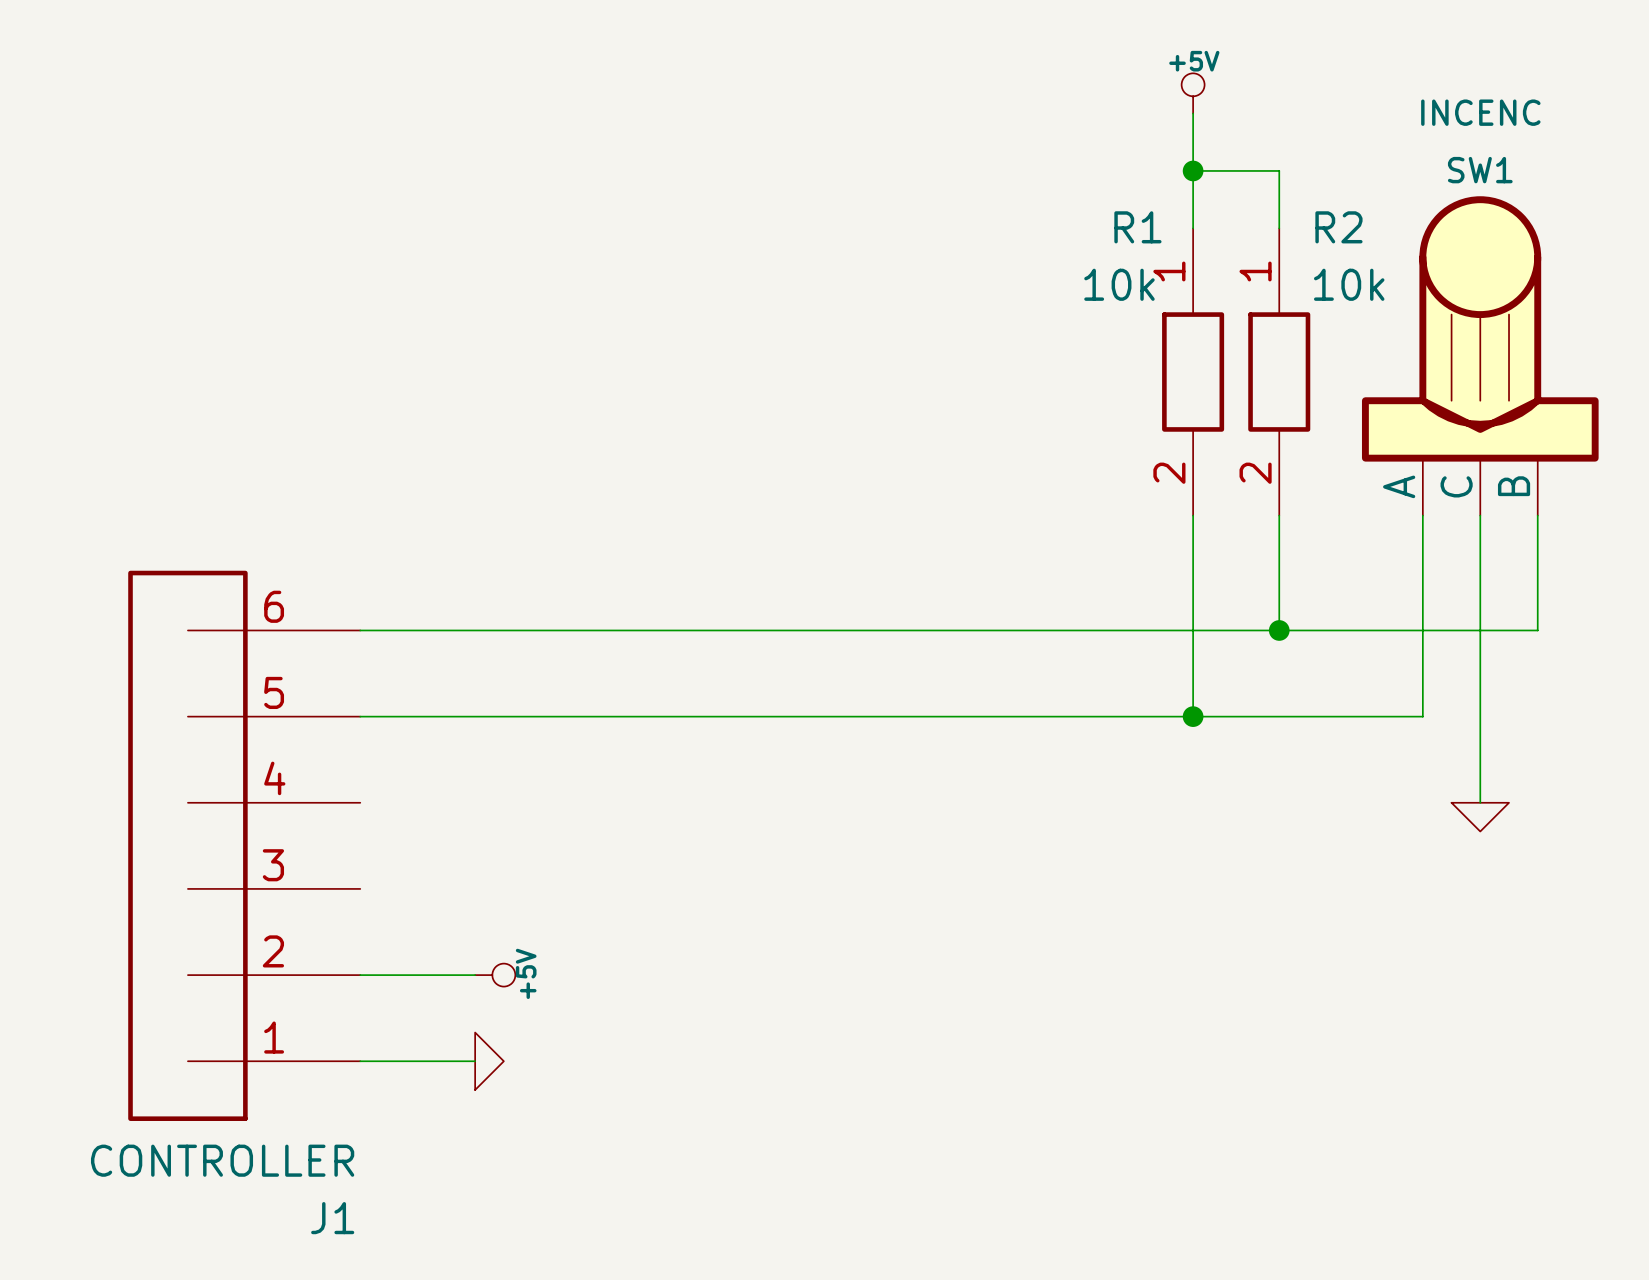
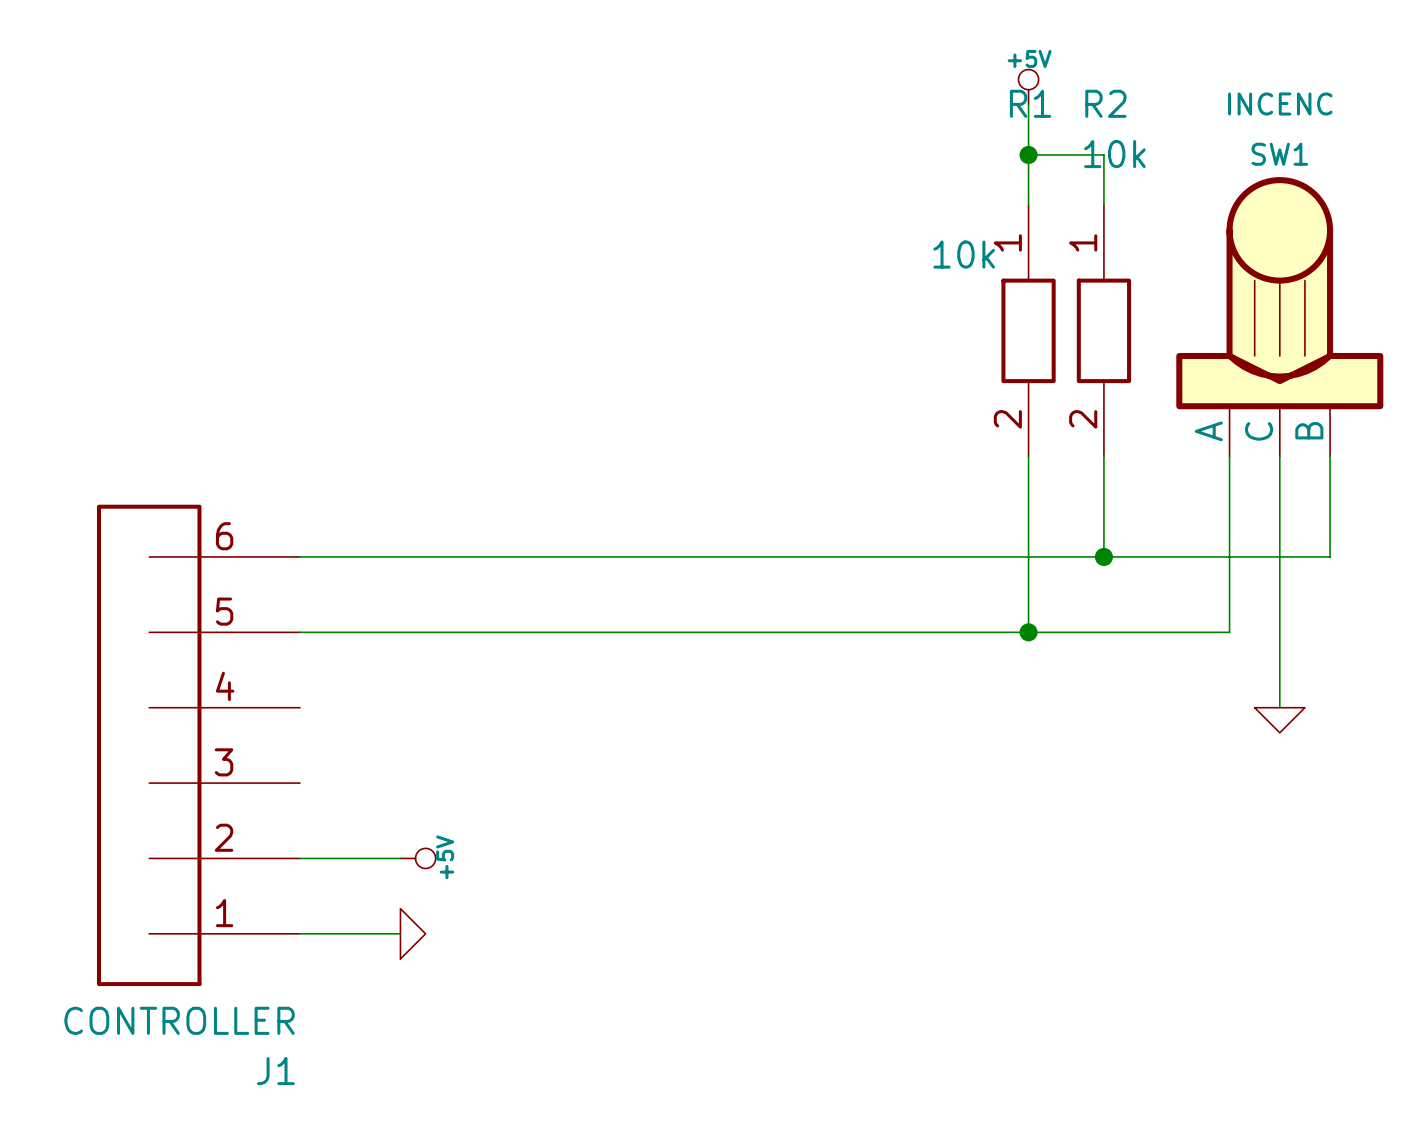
R1 name position: R1 (1137, 227) -> R1 (1030, 103)
R2 name position: R2 (1338, 227) -> R2 (1105, 103)
R2 value position: 10k (1349, 284) -> 10k (1114, 154)

